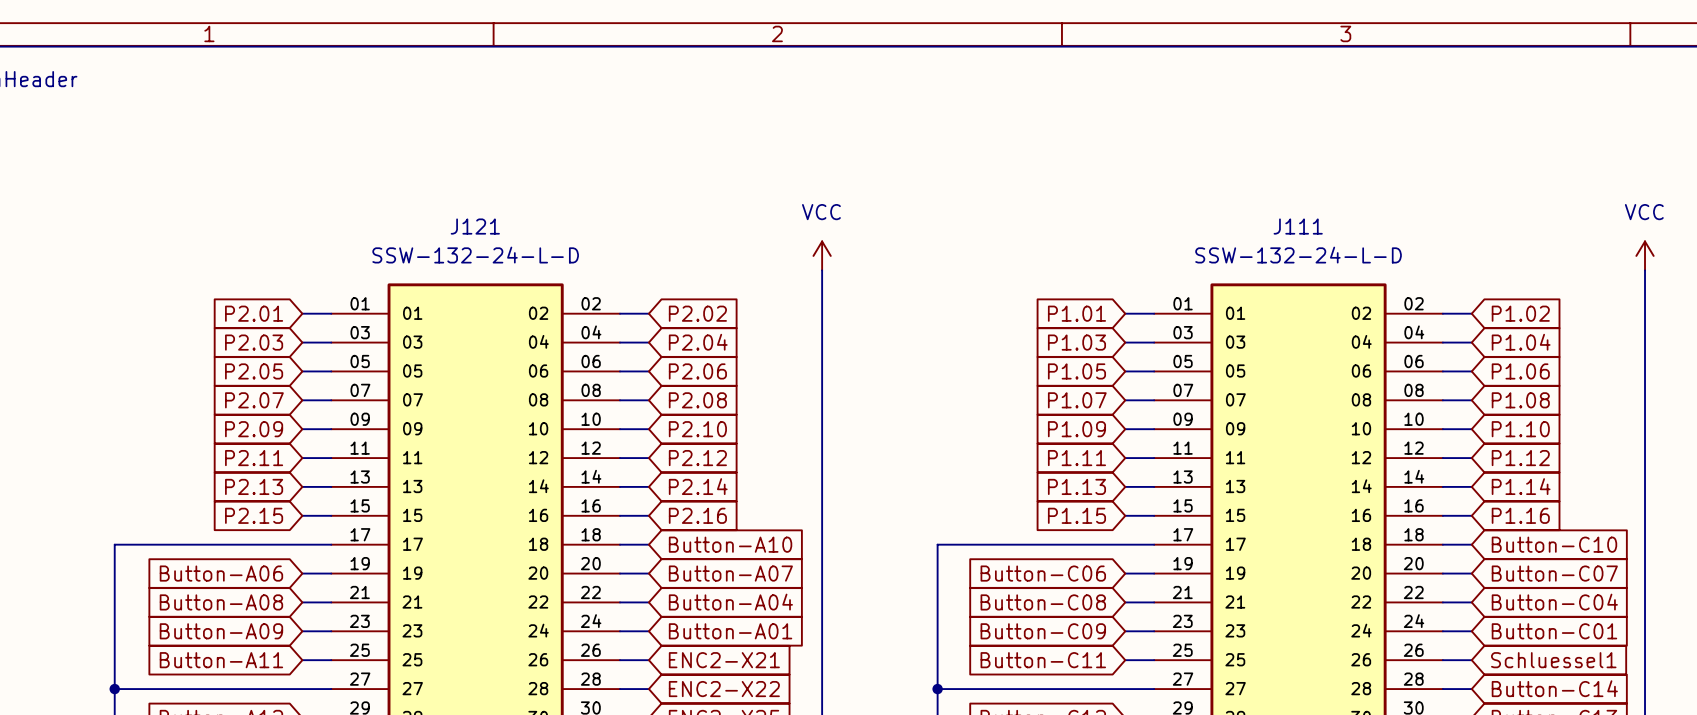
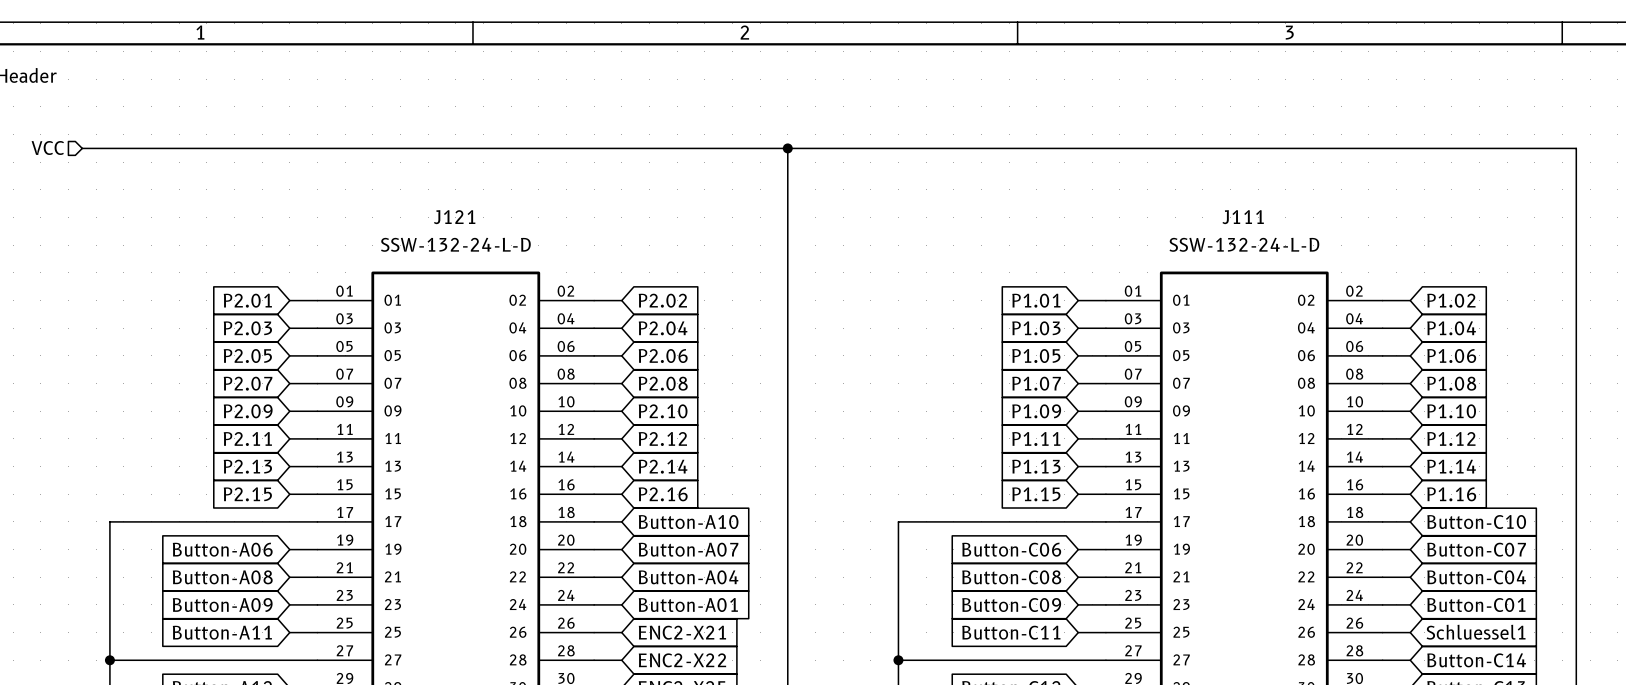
hierarchical label: none -> VCC (47, 147)
wire: none -> (82, 148) (1576, 148) (1576, 259)
wire: none -> (787, 148) (787, 259)
junction: none -> (787, 148)
power symbol: VCC (822, 255) -> none
power symbol: VCC (1645, 255) -> none

